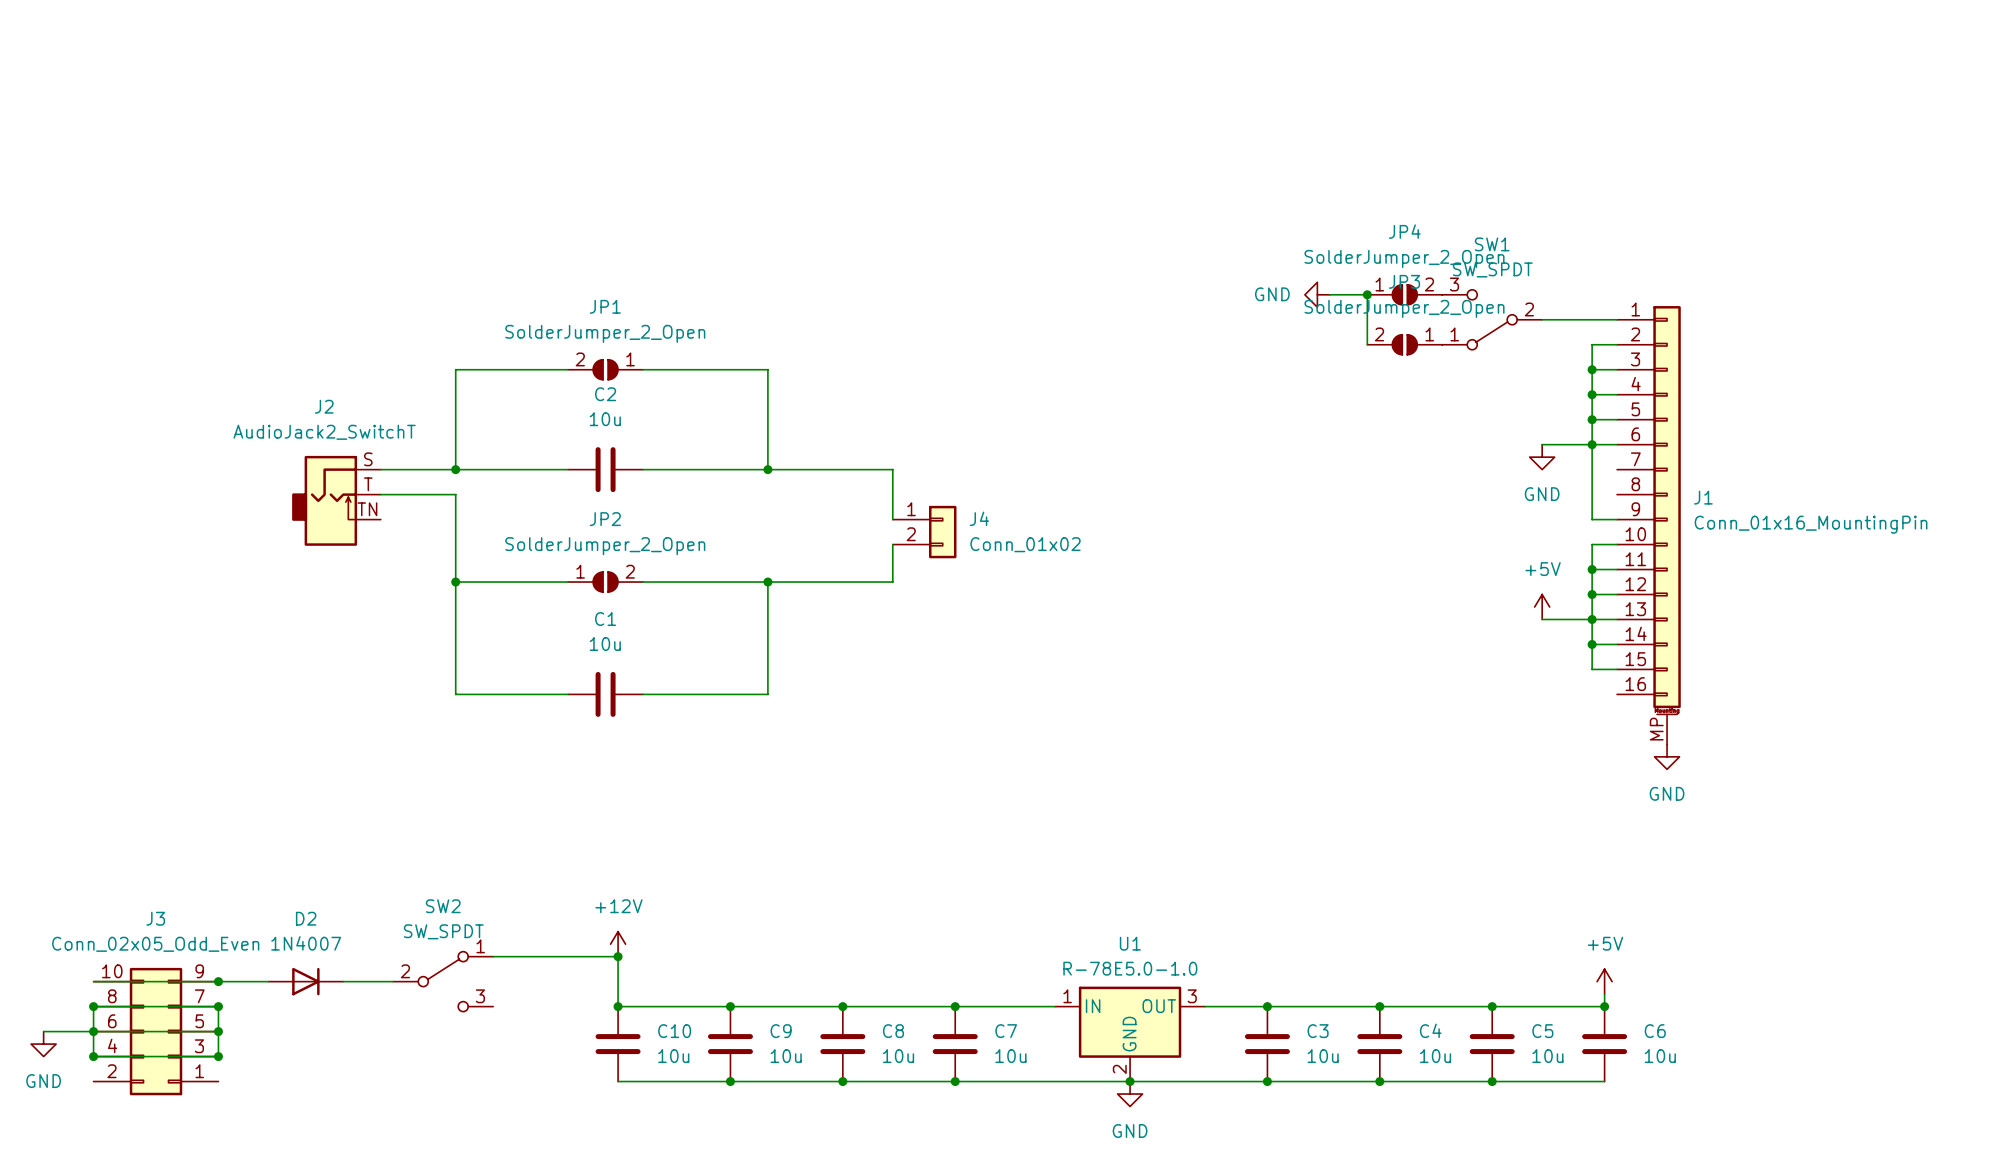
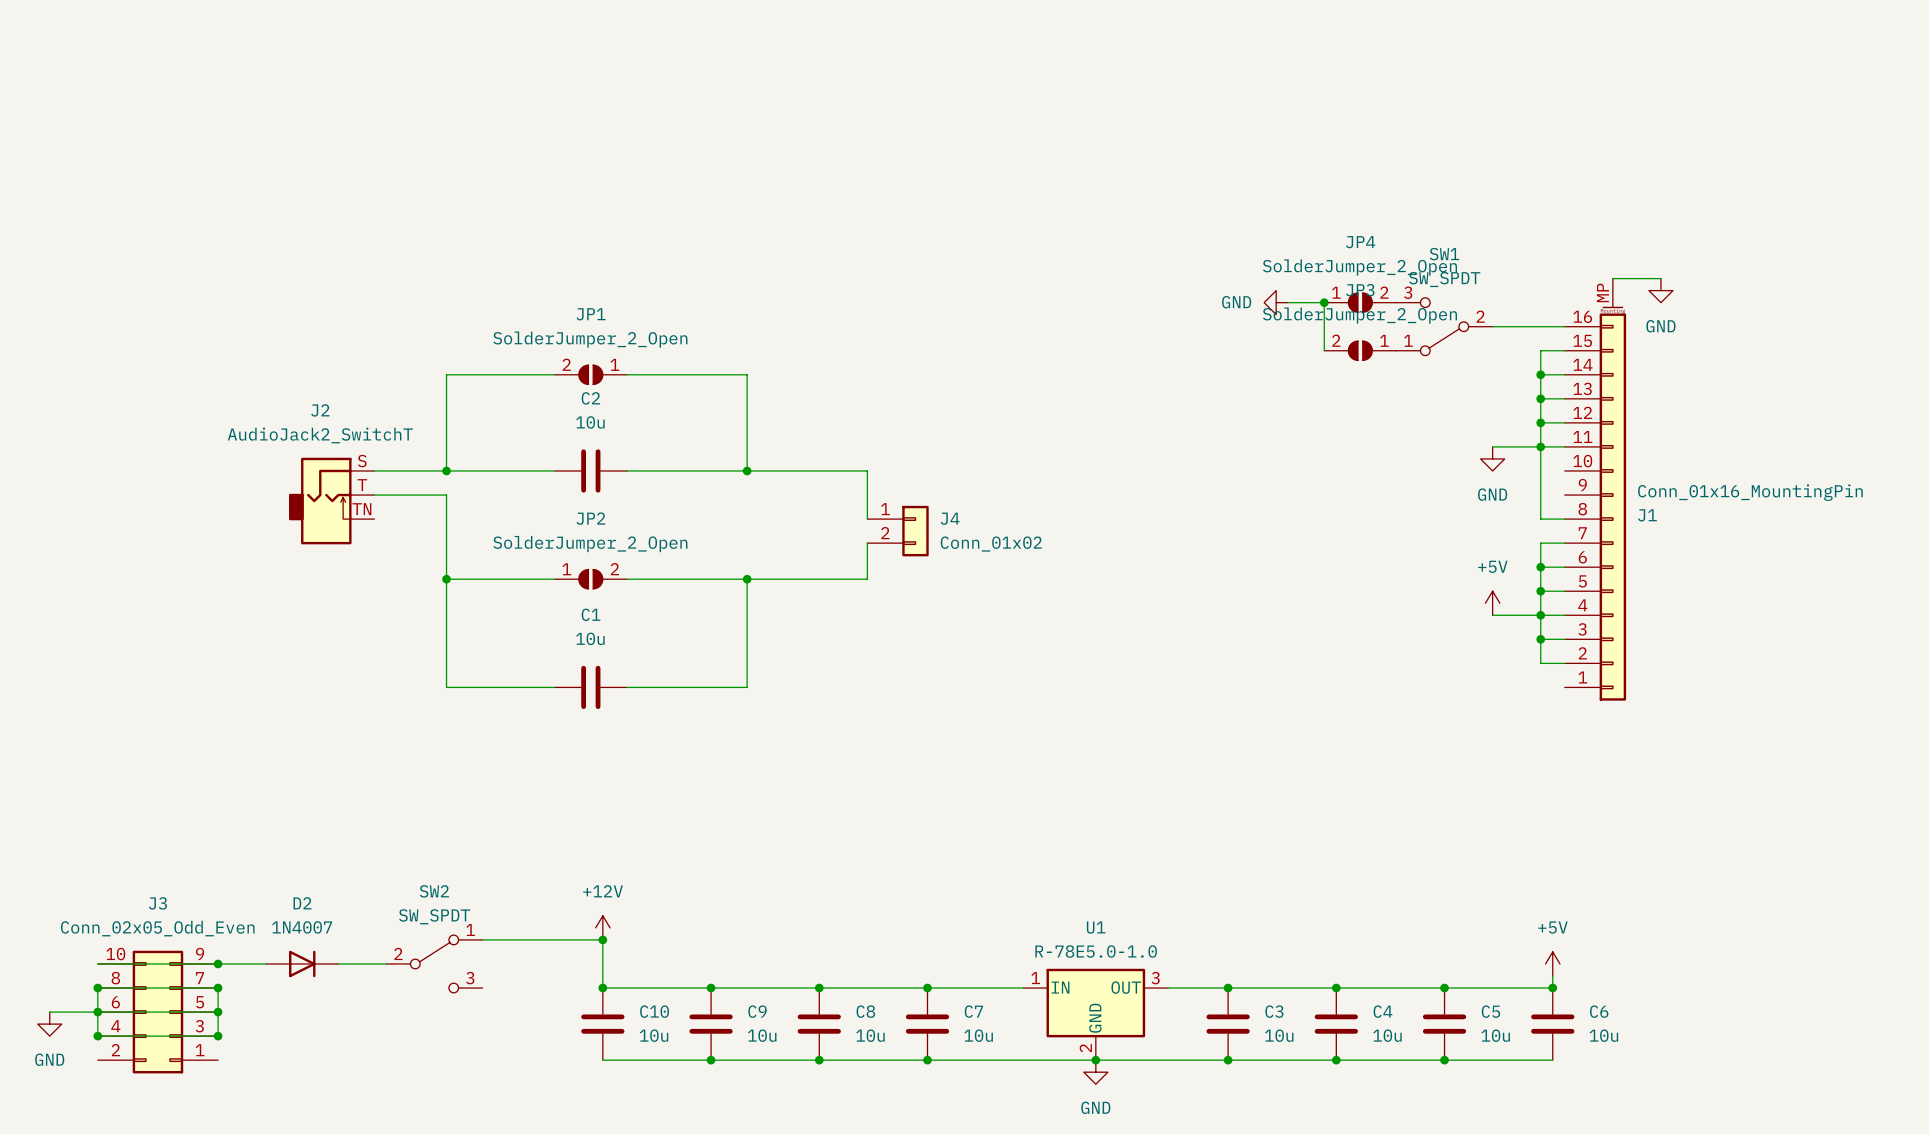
wire: none -> (1612, 278) (1660, 278)
power symbol: none -> GND (1660, 290)
J1 flip: as is (1667, 510) -> up-down (1612, 503)
power symbol: GND (1667, 756) -> none

